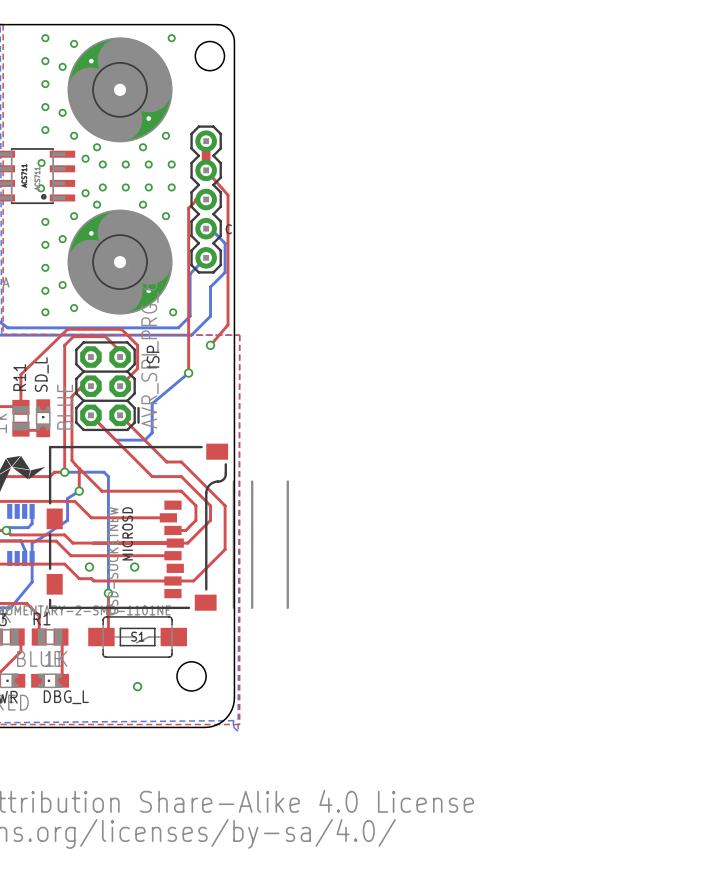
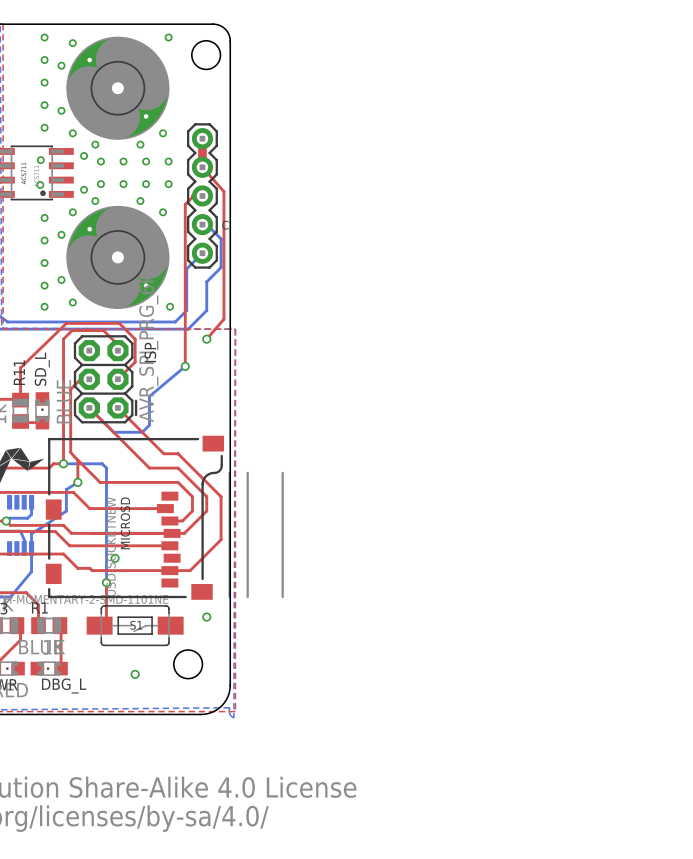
via: (89, 567) -> none
via: (134, 567) -> none
via: none -> (115, 558)
via: none -> (206, 617)

